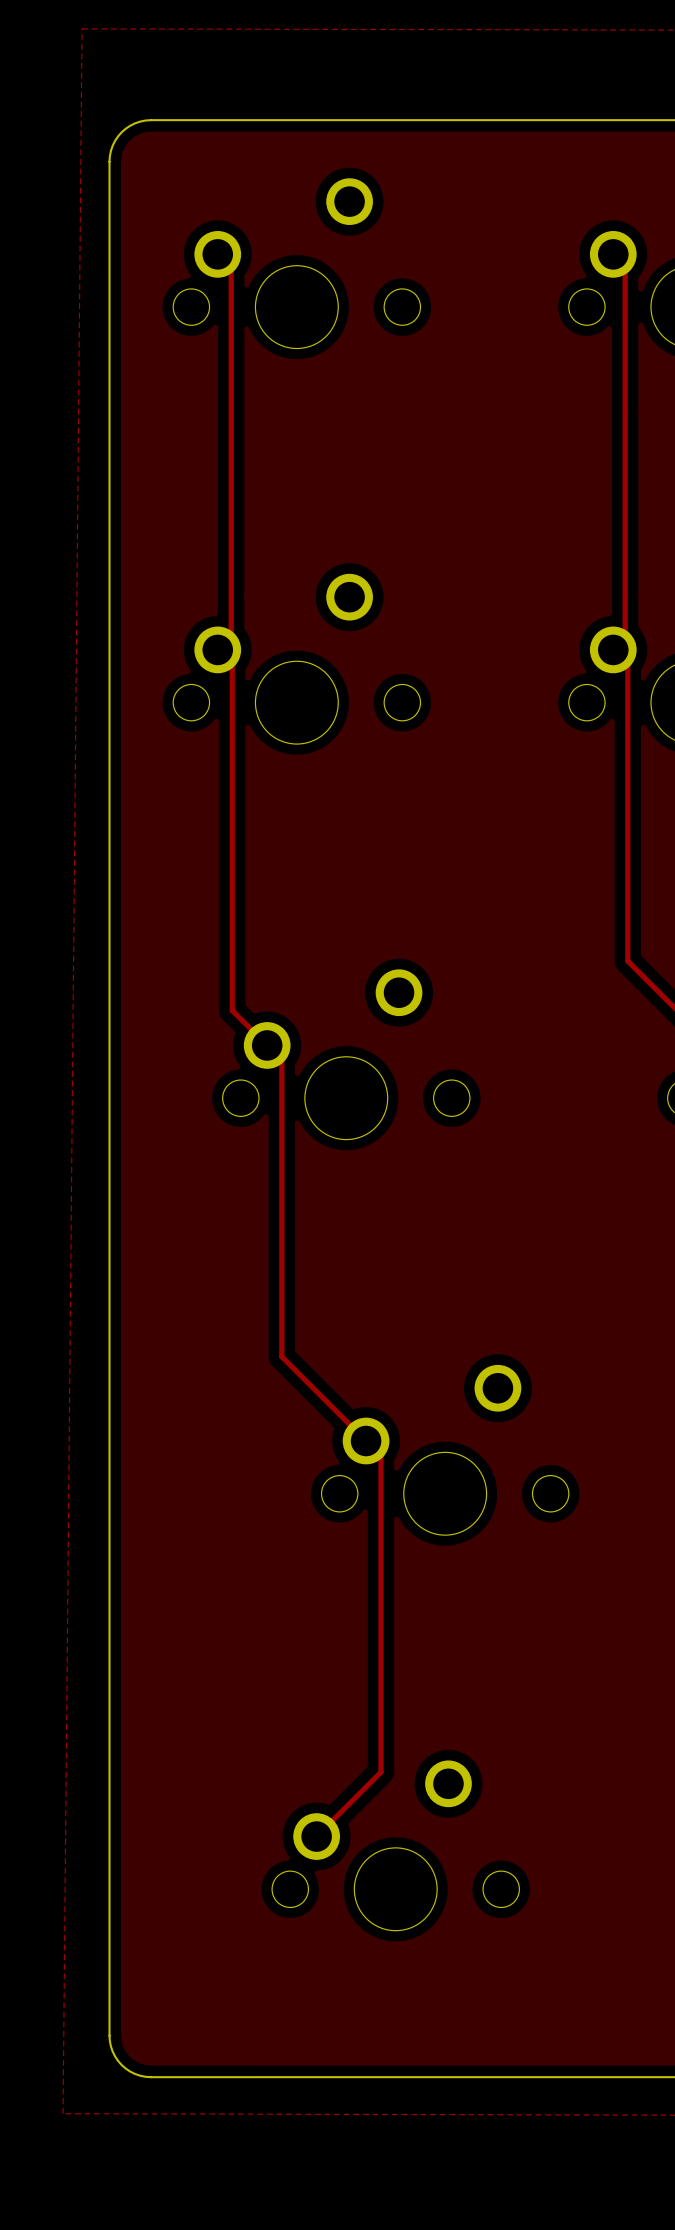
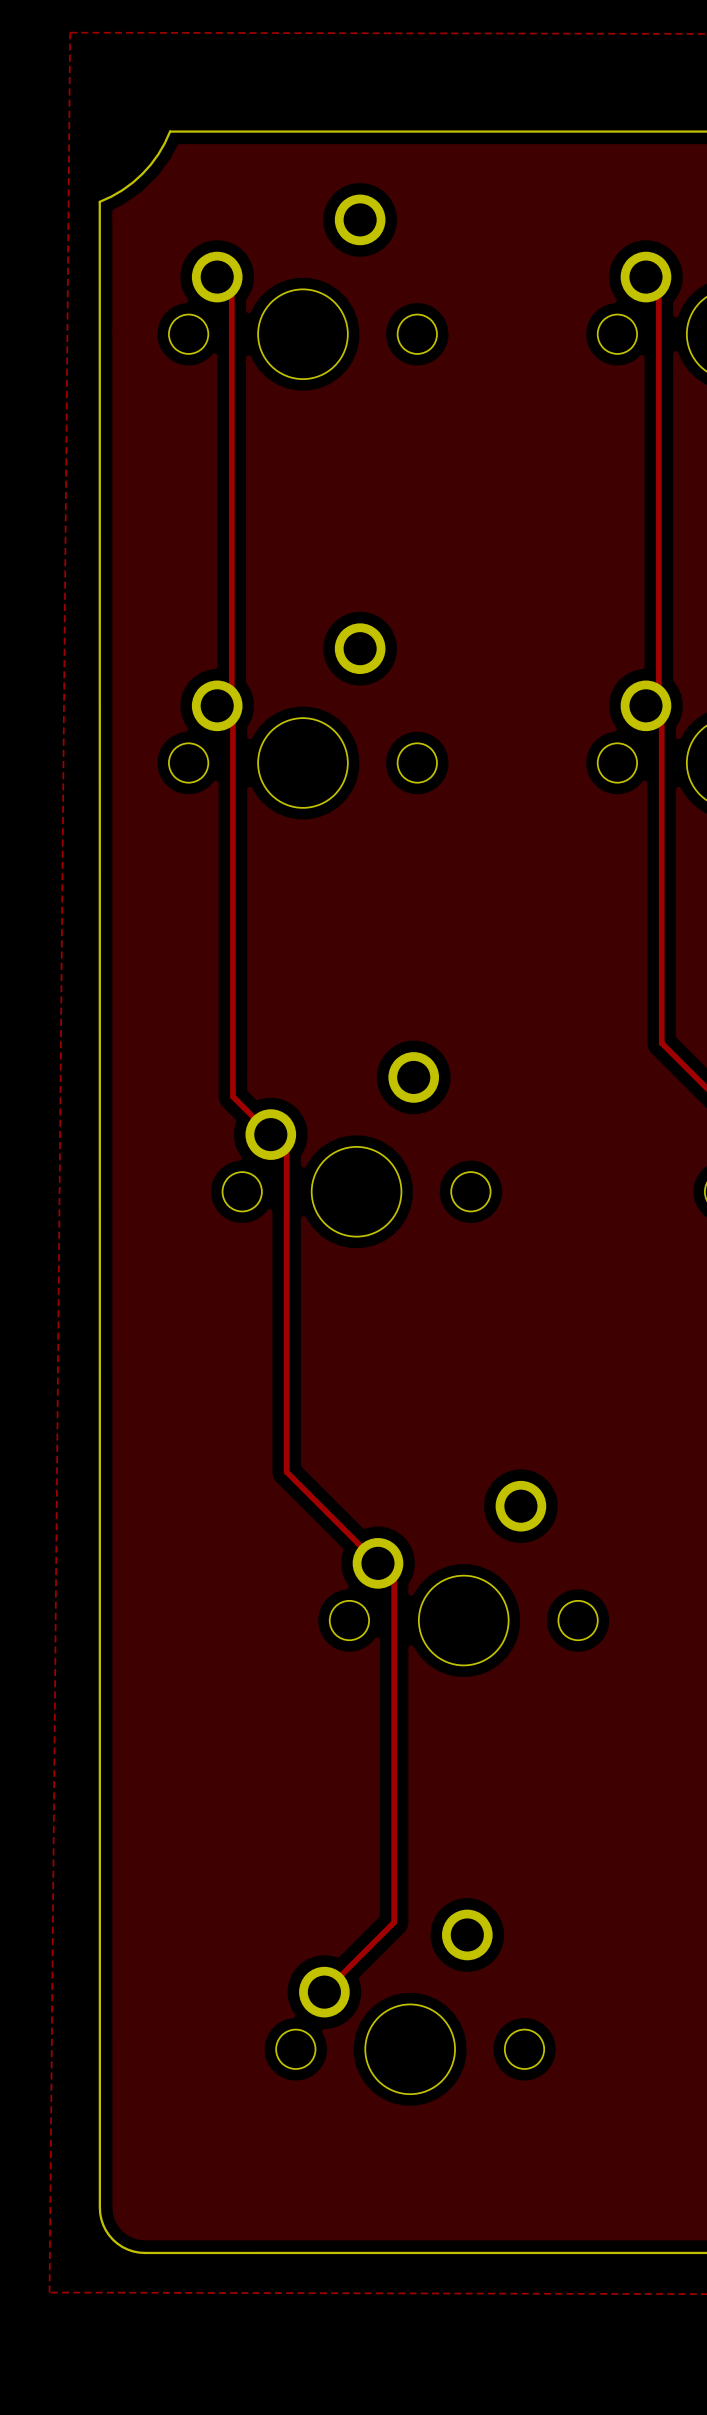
board edge: (174, 120) (145, 120) (130, 125) (115, 140) (109, 161) (109, 2035) -> (170, 131) (158, 154) (142, 174) (122, 190) (99, 201) (99, 2207)

